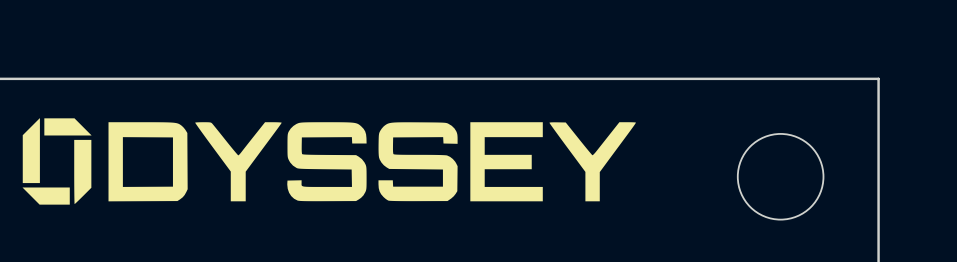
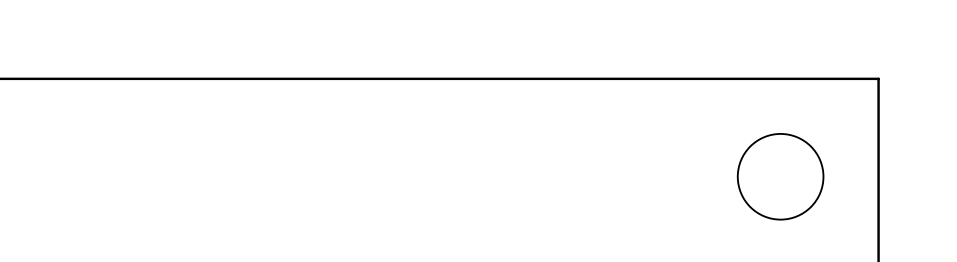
drawing: [22, 118, 636, 205] -> none

